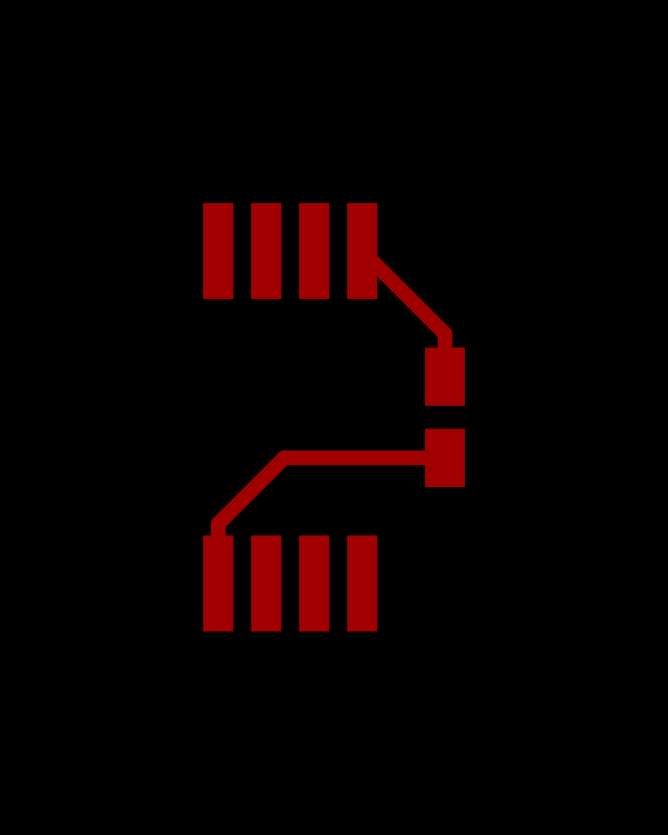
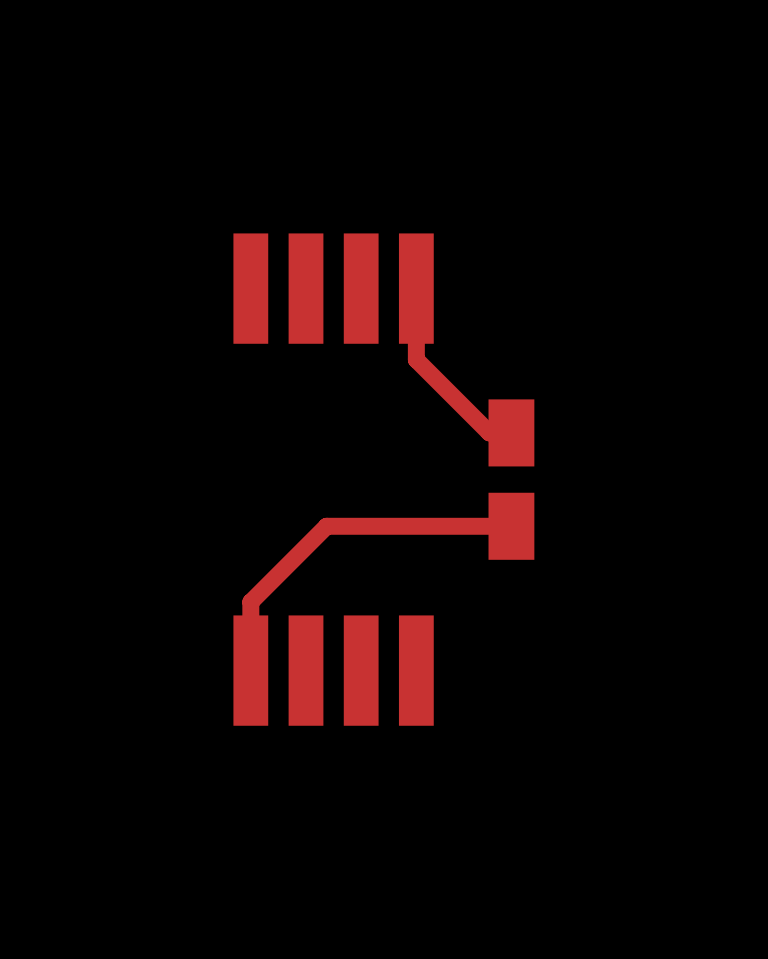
top track: (362, 251) (444, 333) (444, 376) -> (416, 288) (416, 359) (489, 432) (511, 432)

